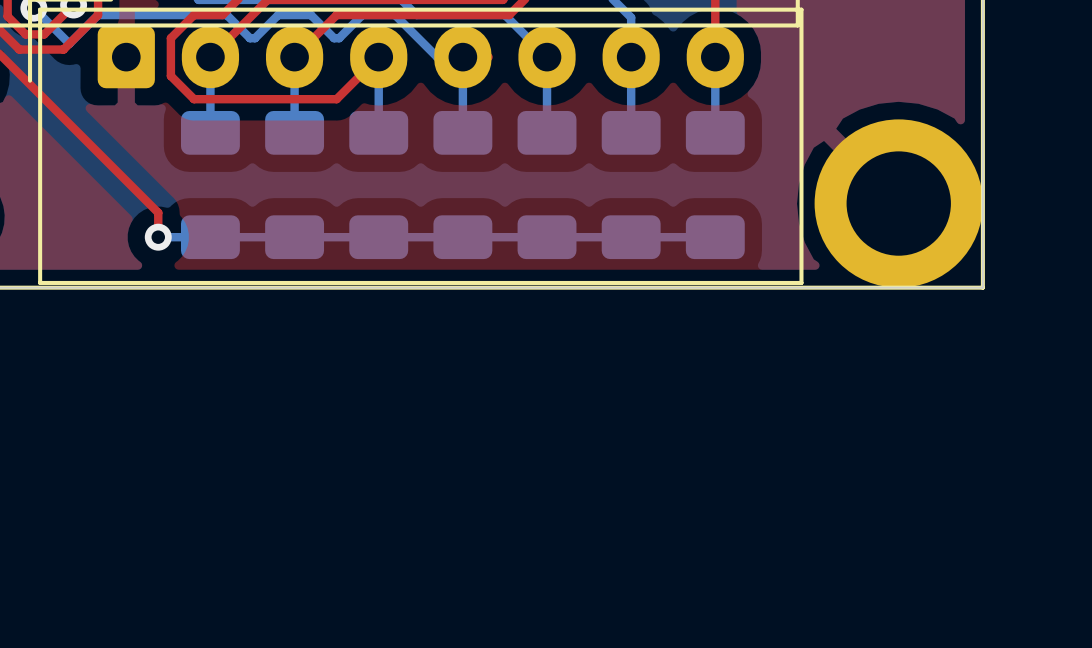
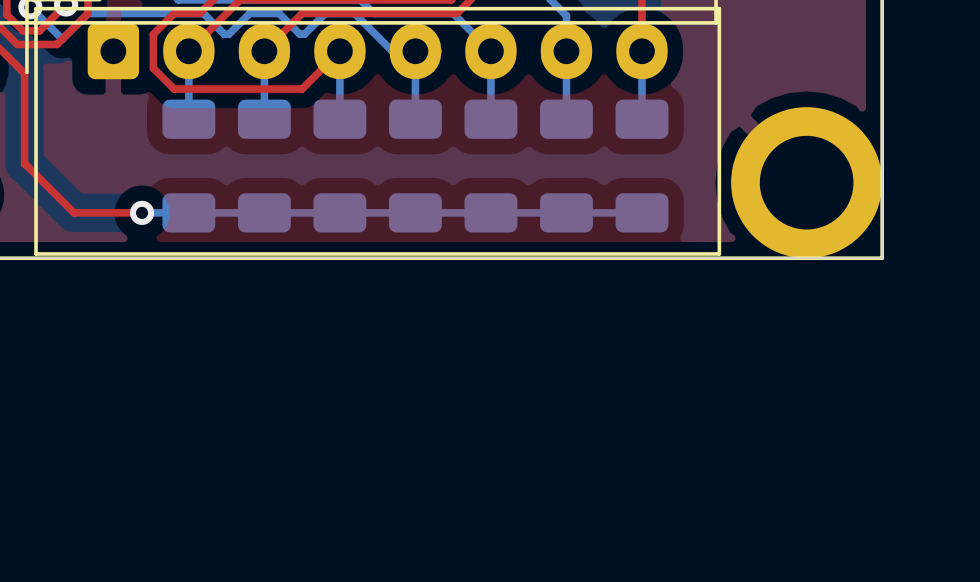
top track: (27, 81) (158, 212) (158, 237) -> (24, 73) (24, 164) (74, 212) (142, 212)

